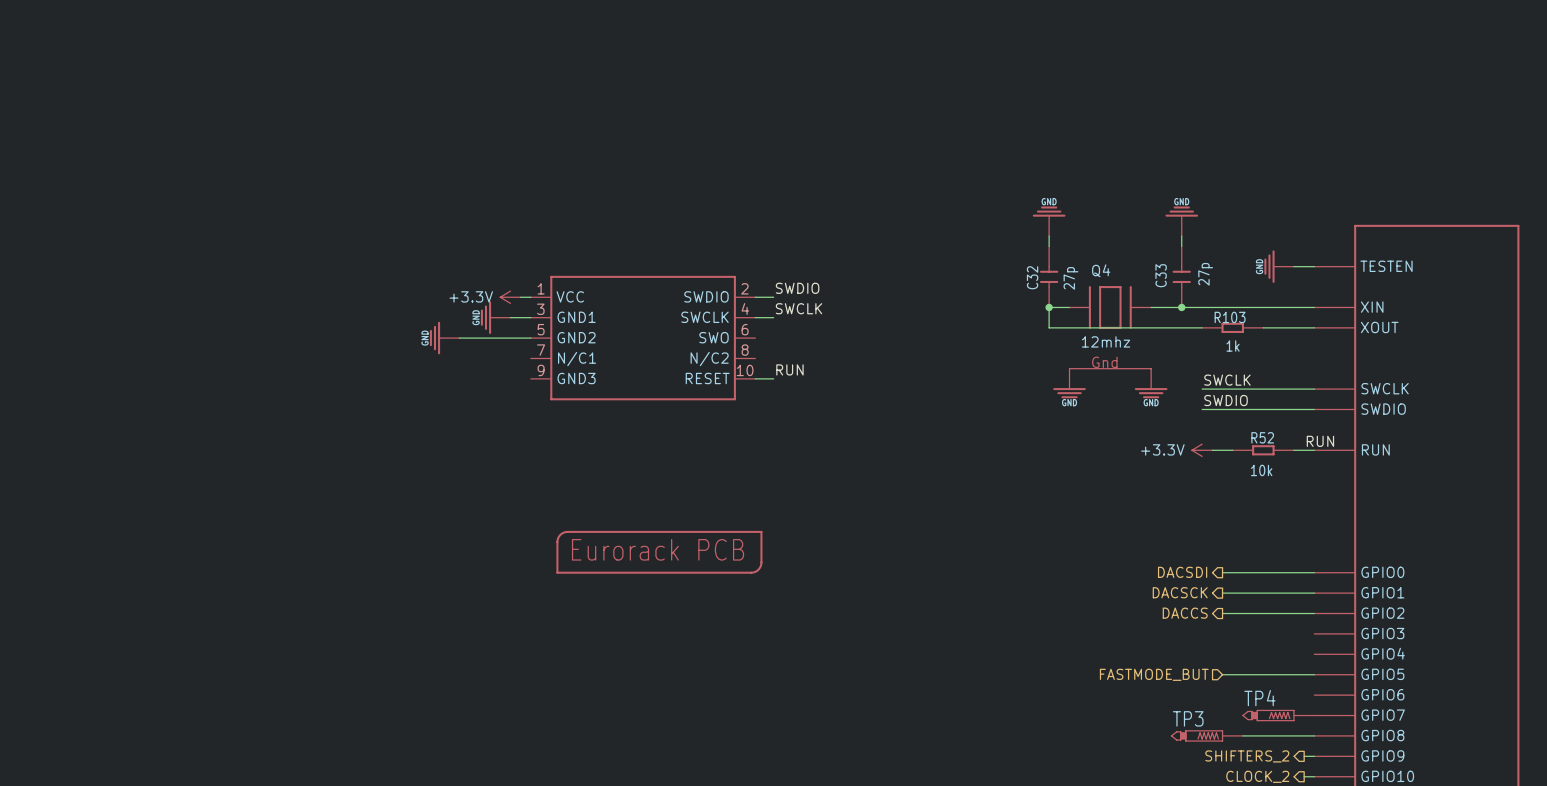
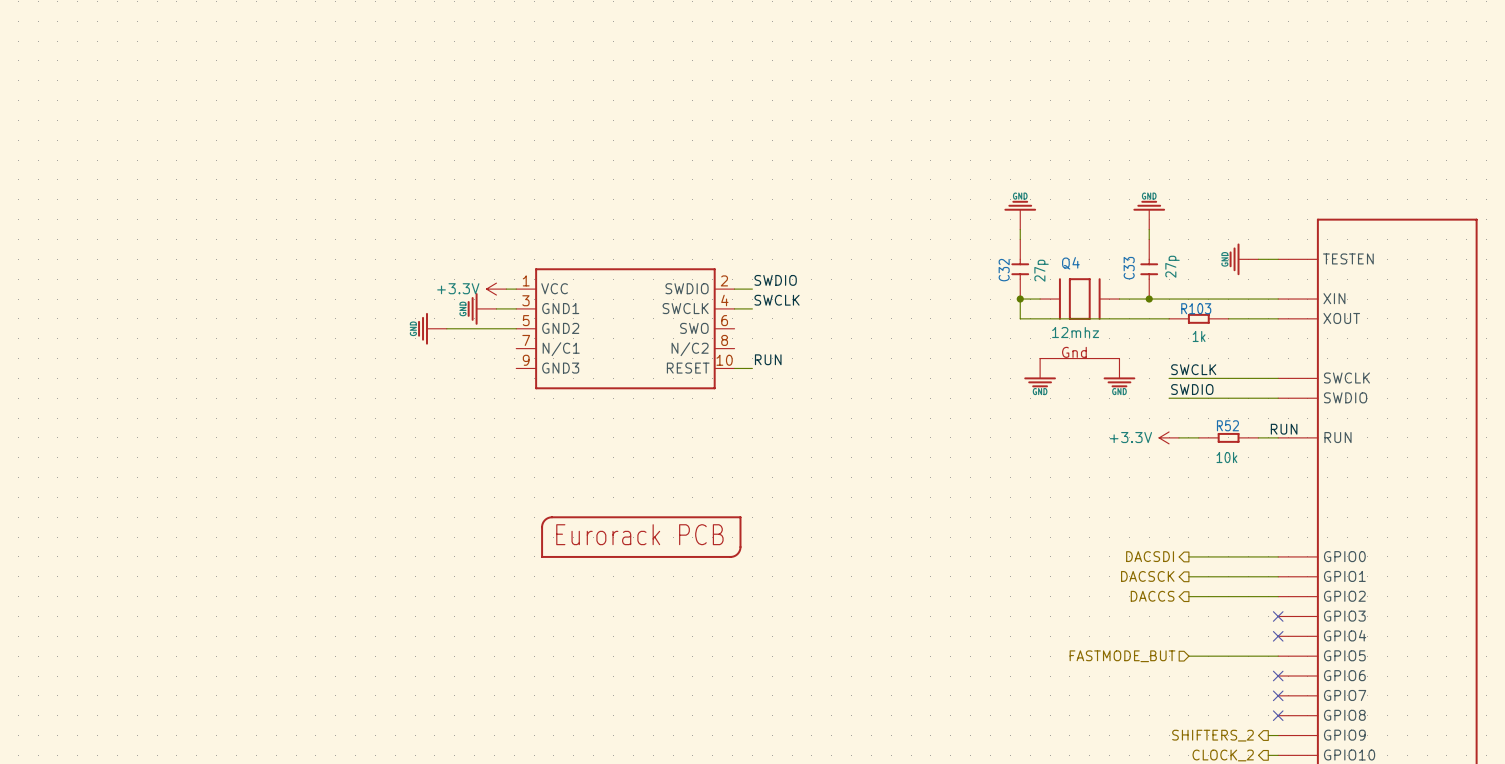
no-connect mark: none -> (1278, 616)
no-connect mark: none -> (1278, 636)
no-connect mark: none -> (1278, 676)
TP4: (1278, 715) -> none
no-connect mark: none -> (1278, 695)
TP3: (1206, 735) -> none
wire: (1242, 735) (1314, 735) -> none
no-connect mark: none -> (1278, 715)

